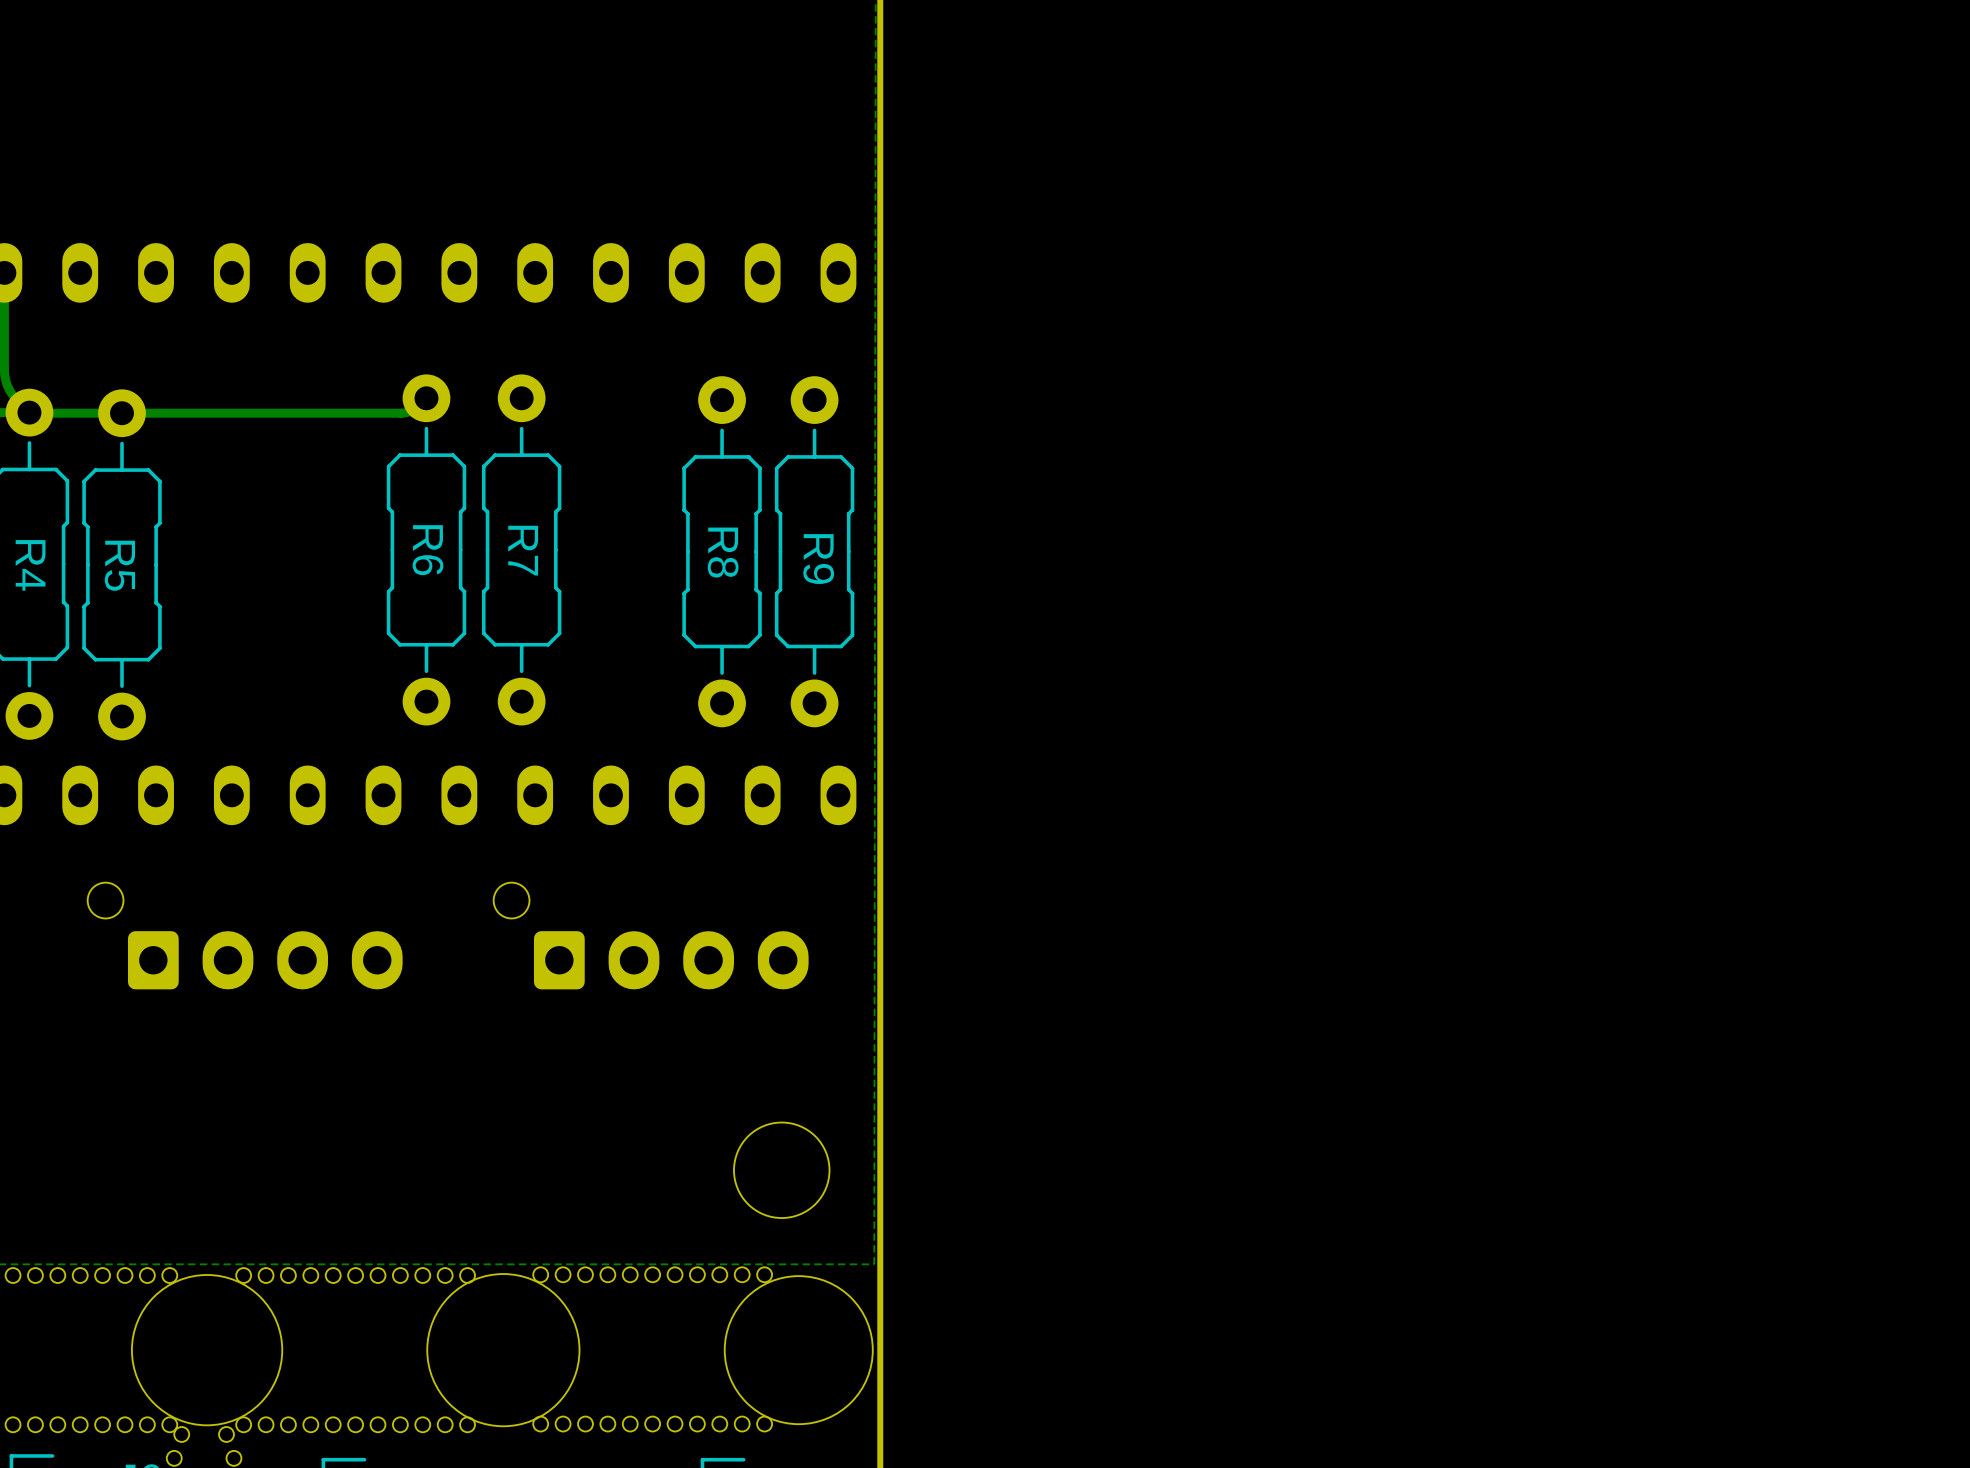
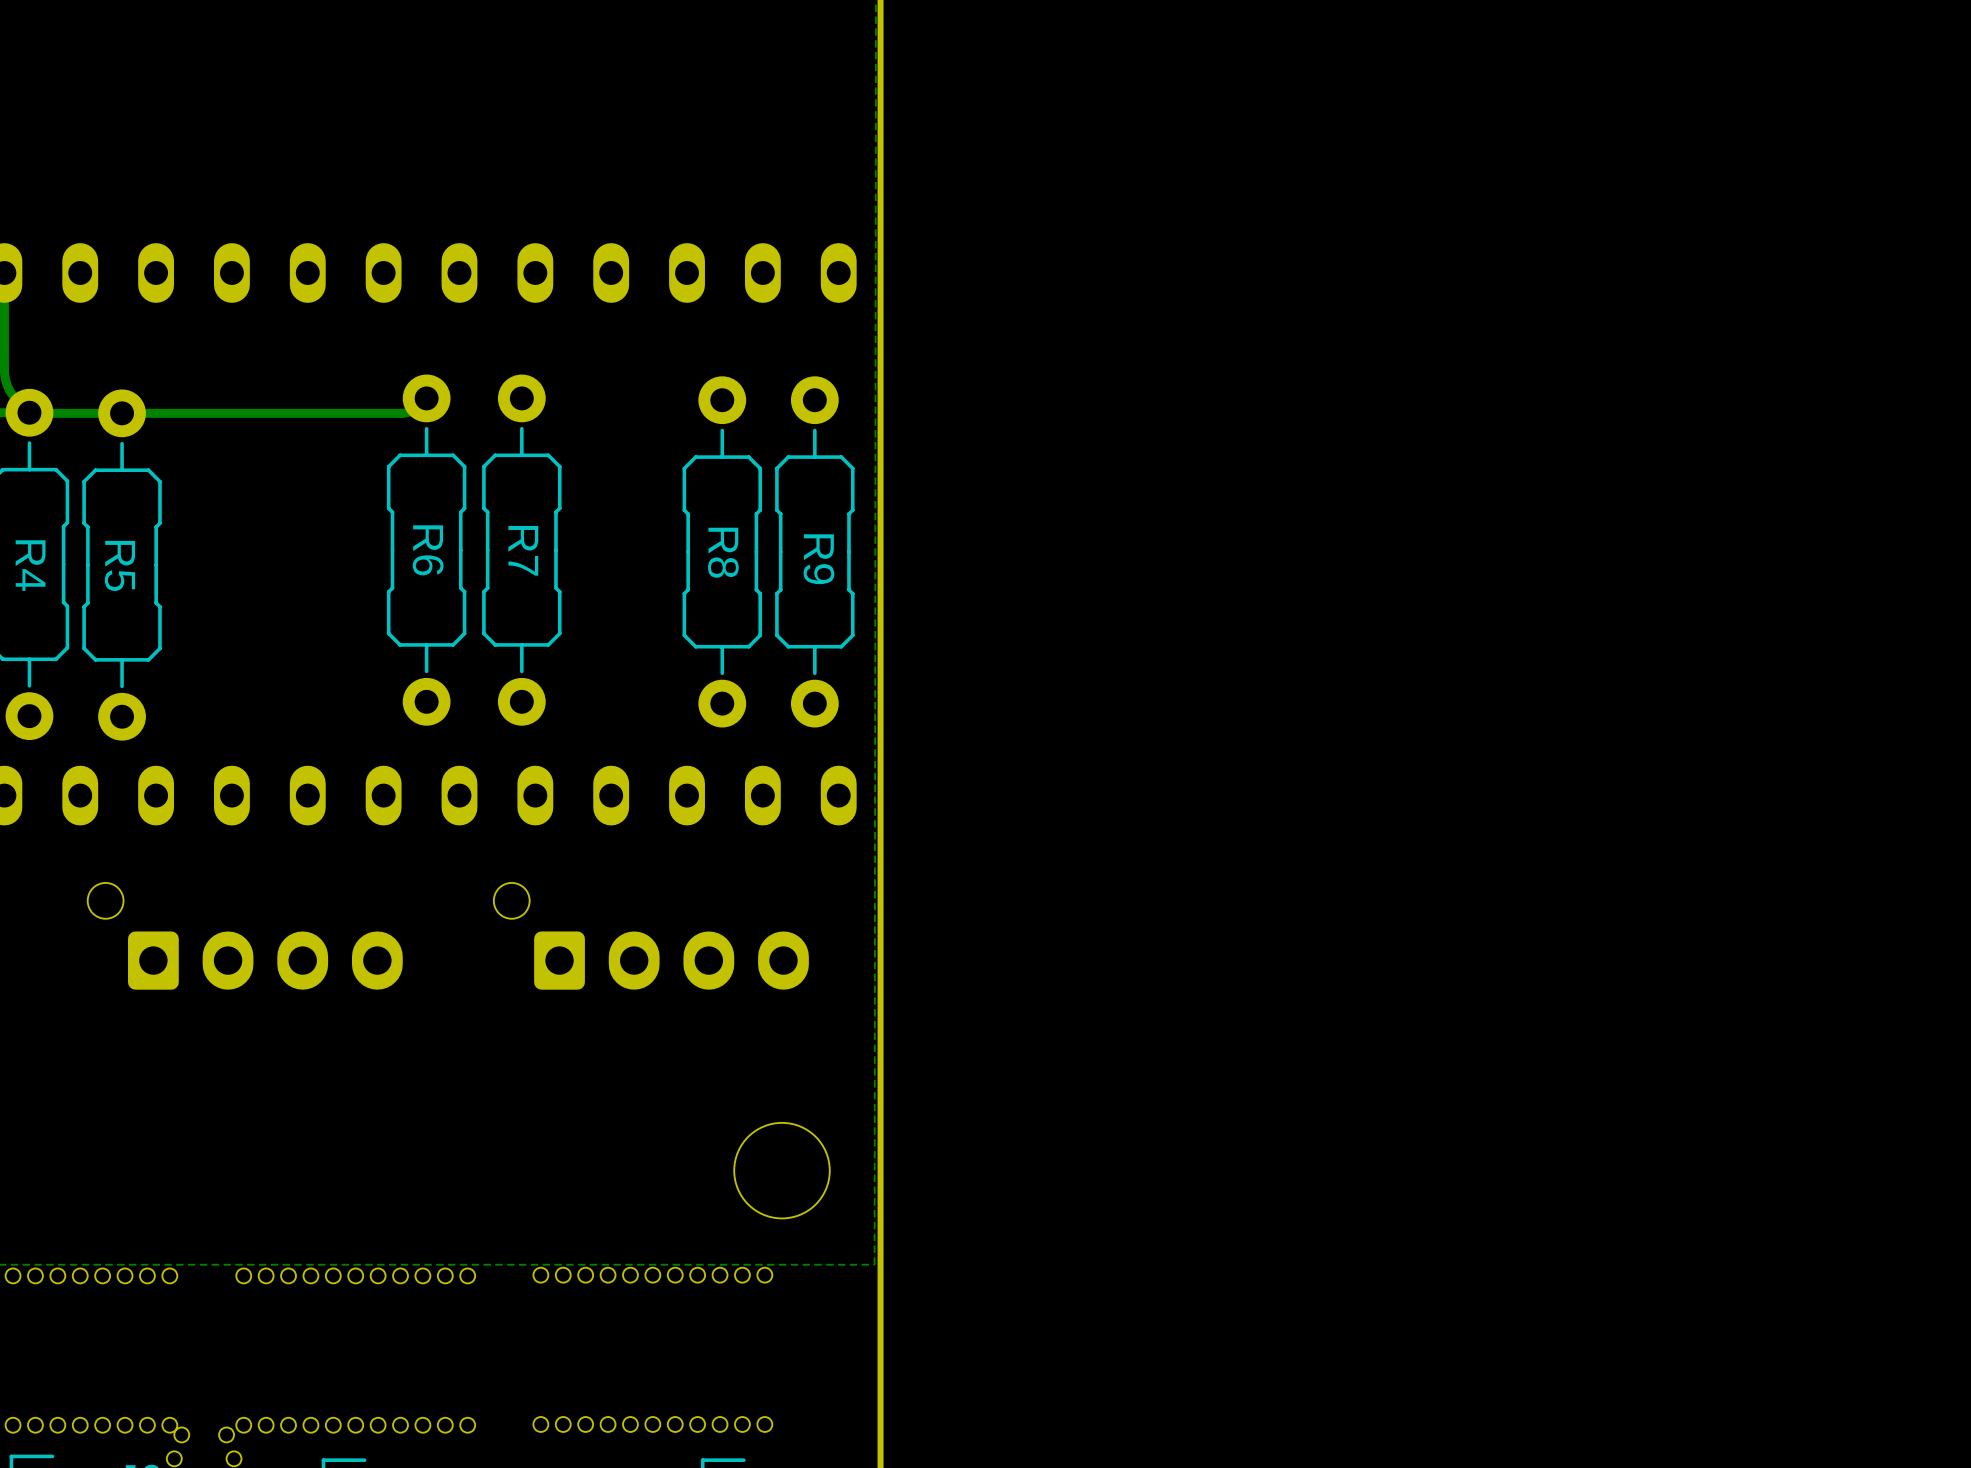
round board edge: [426, 1273, 581, 1428] -> none
round board edge: [131, 1274, 284, 1427] -> none
round board edge: [723, 1275, 874, 1425] -> none

